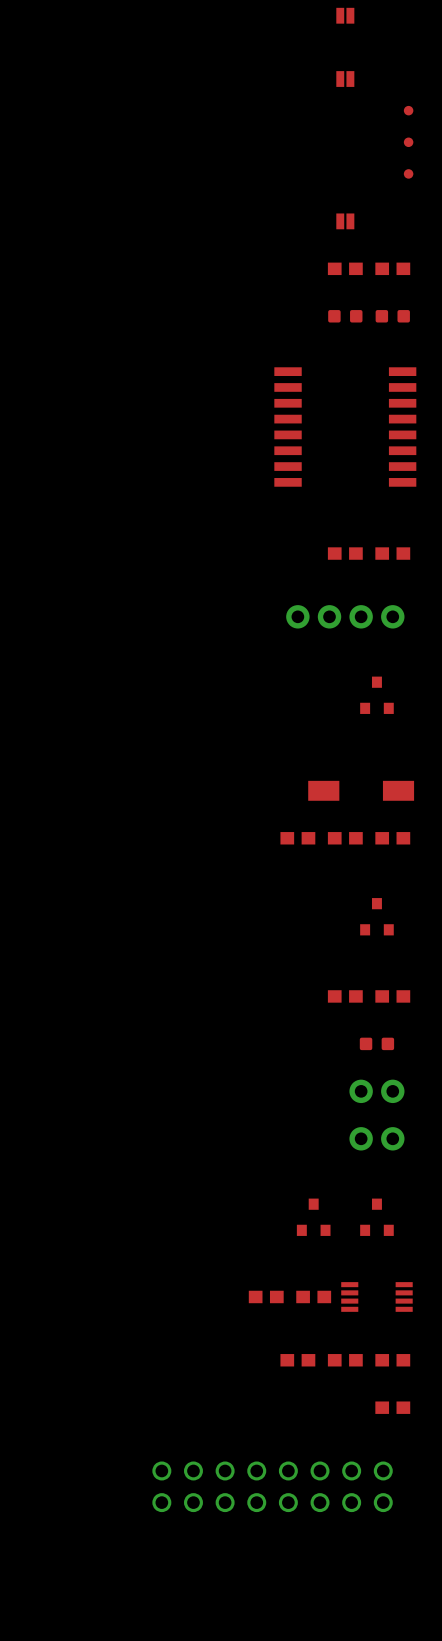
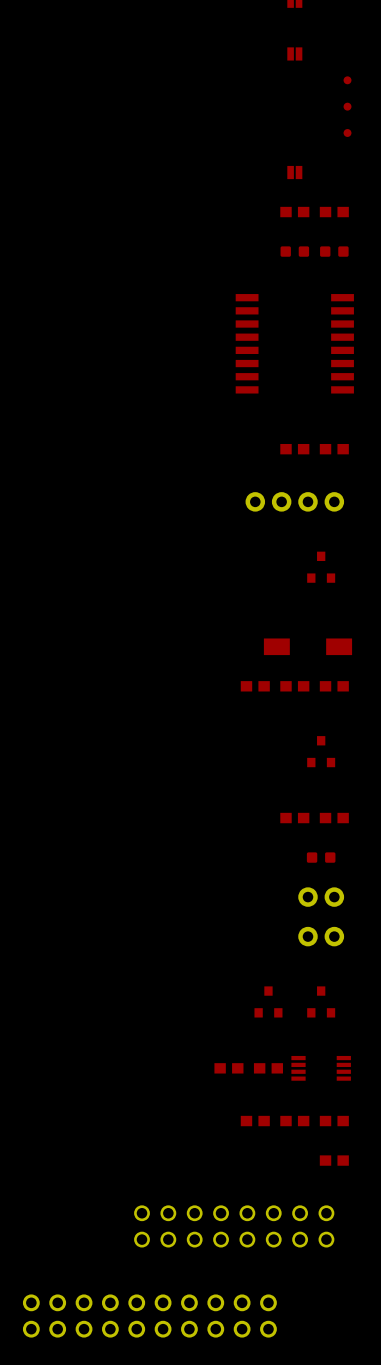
part: none -> (149, 1316)

